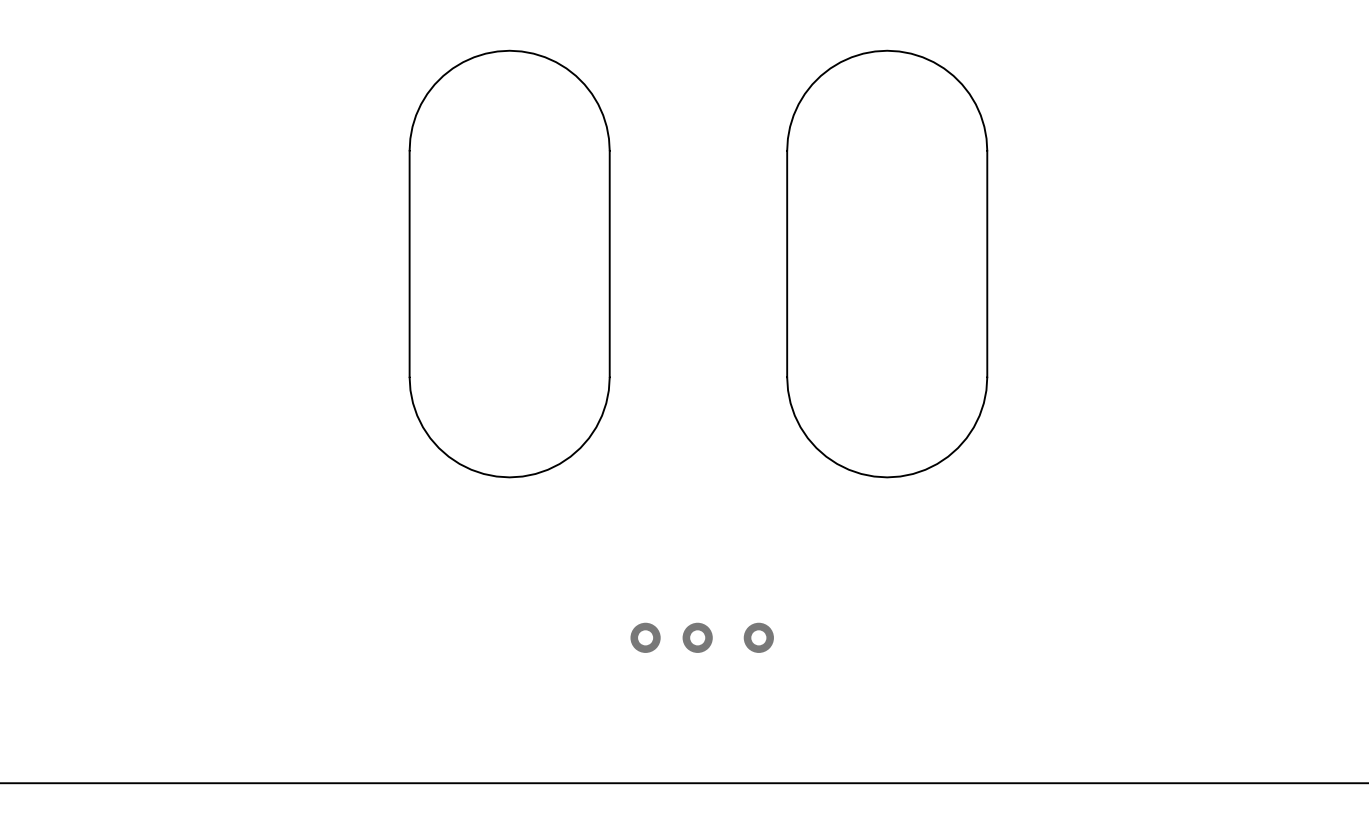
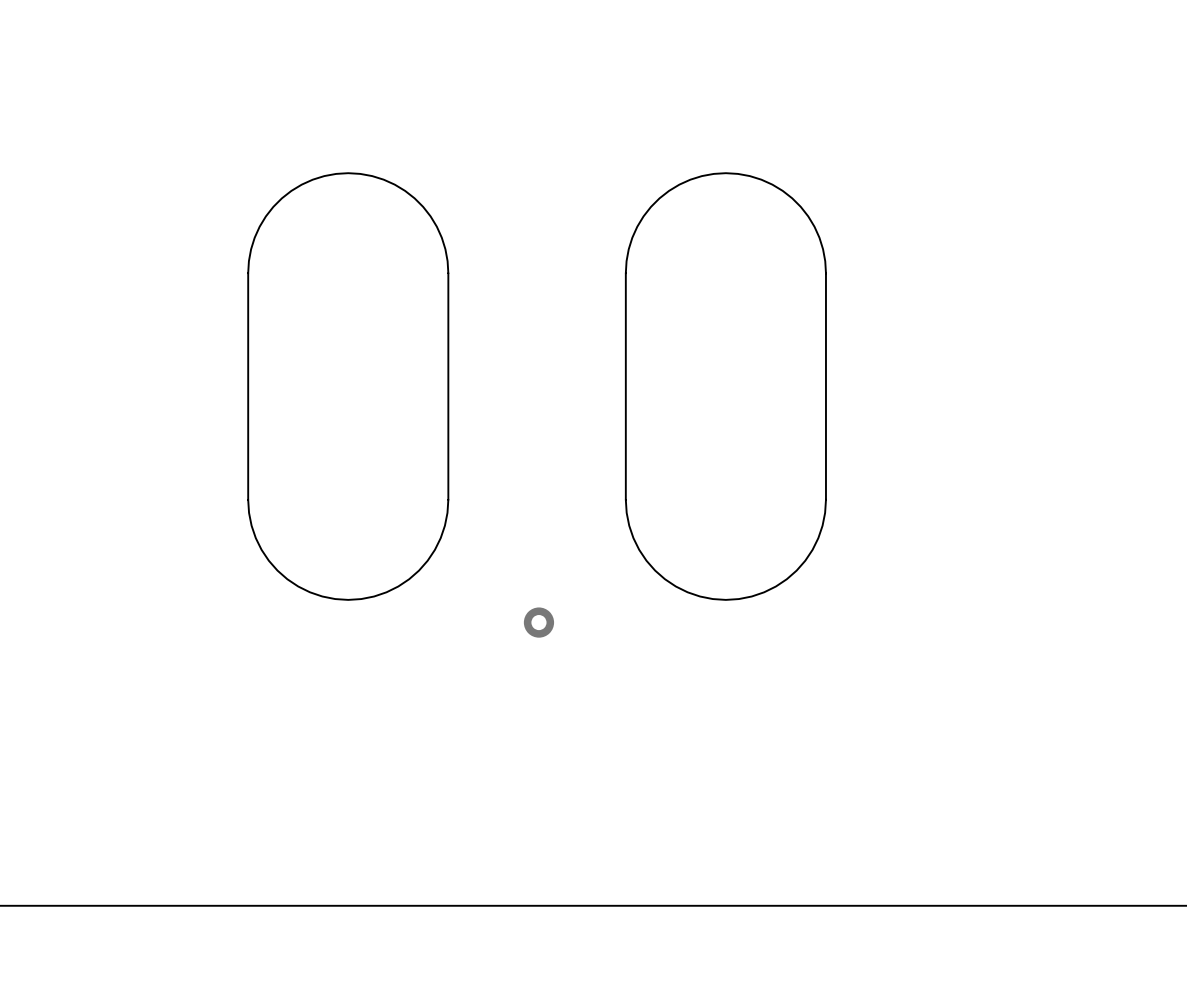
via: none -> (538, 622)
via: (645, 637) -> none
via: (697, 637) -> none
via: (758, 637) -> none

